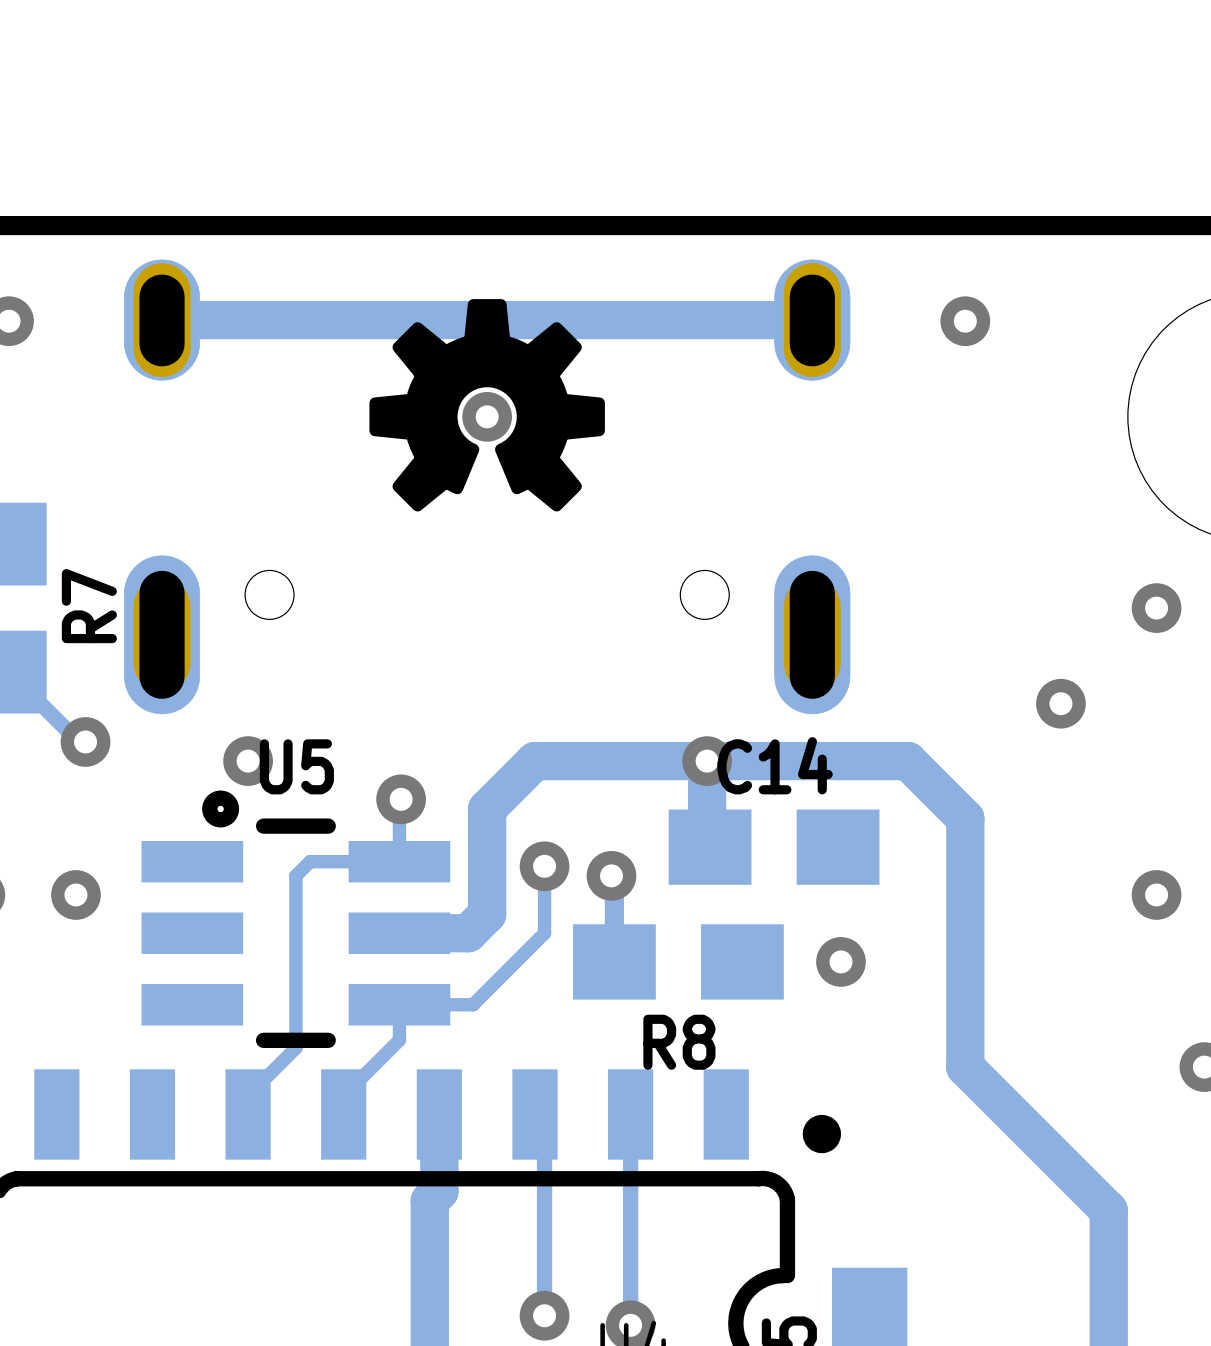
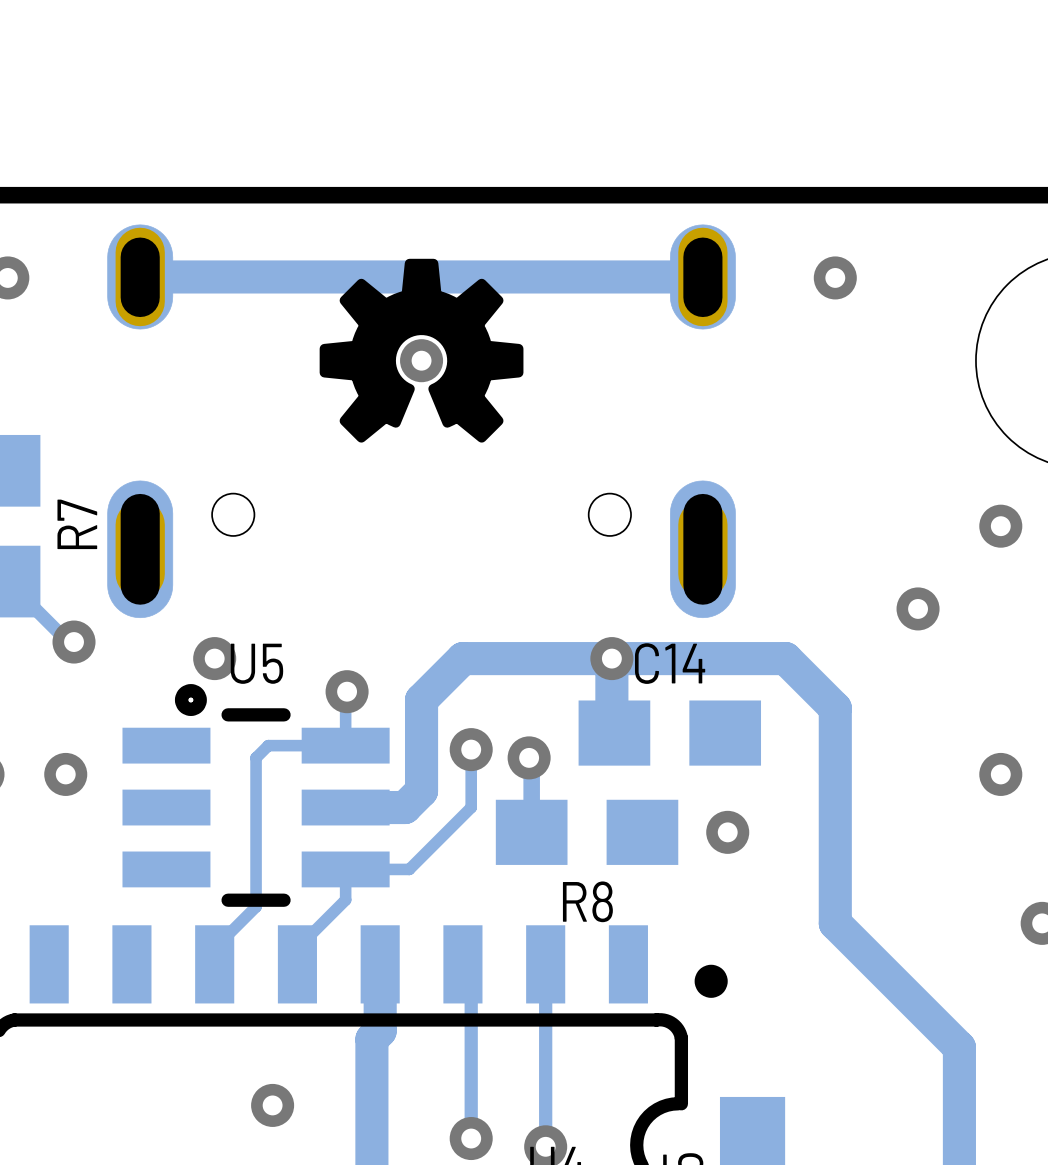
via: none -> (272, 1105)

